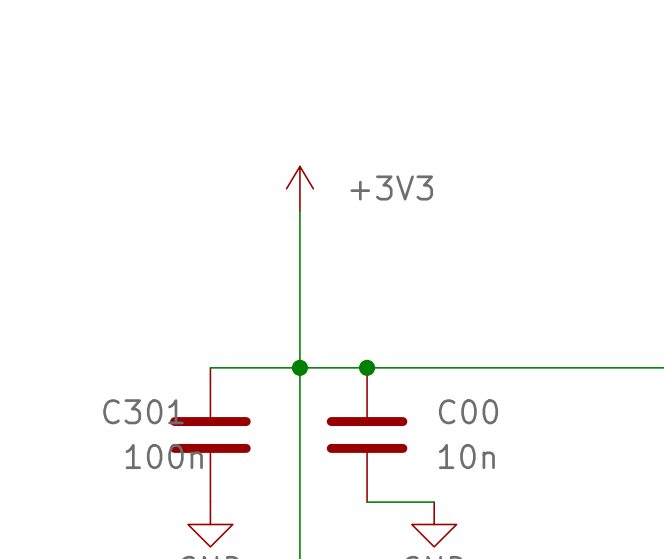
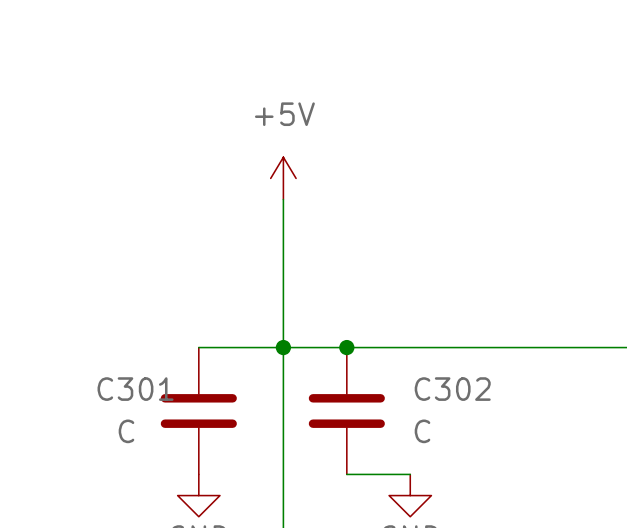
power symbol: +3V3 (299, 188) -> +5V (283, 178)
C00 name: C00 (468, 411) -> C302 (452, 389)
C301 value: 100n (164, 456) -> C (126, 431)
C00 value: 10n (466, 456) -> C (422, 431)

